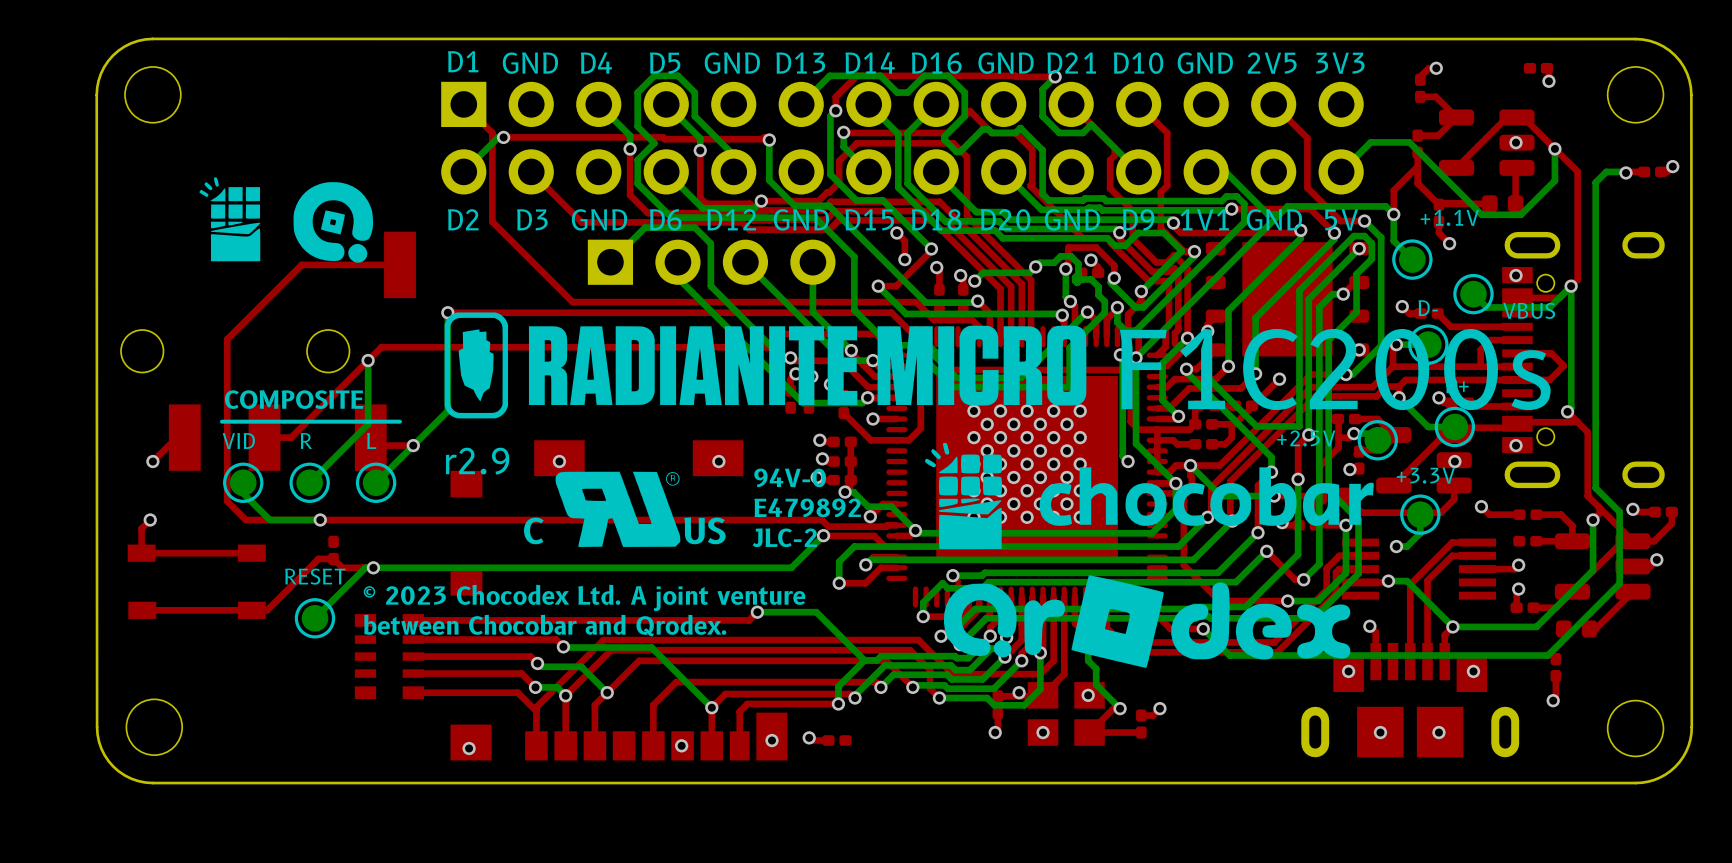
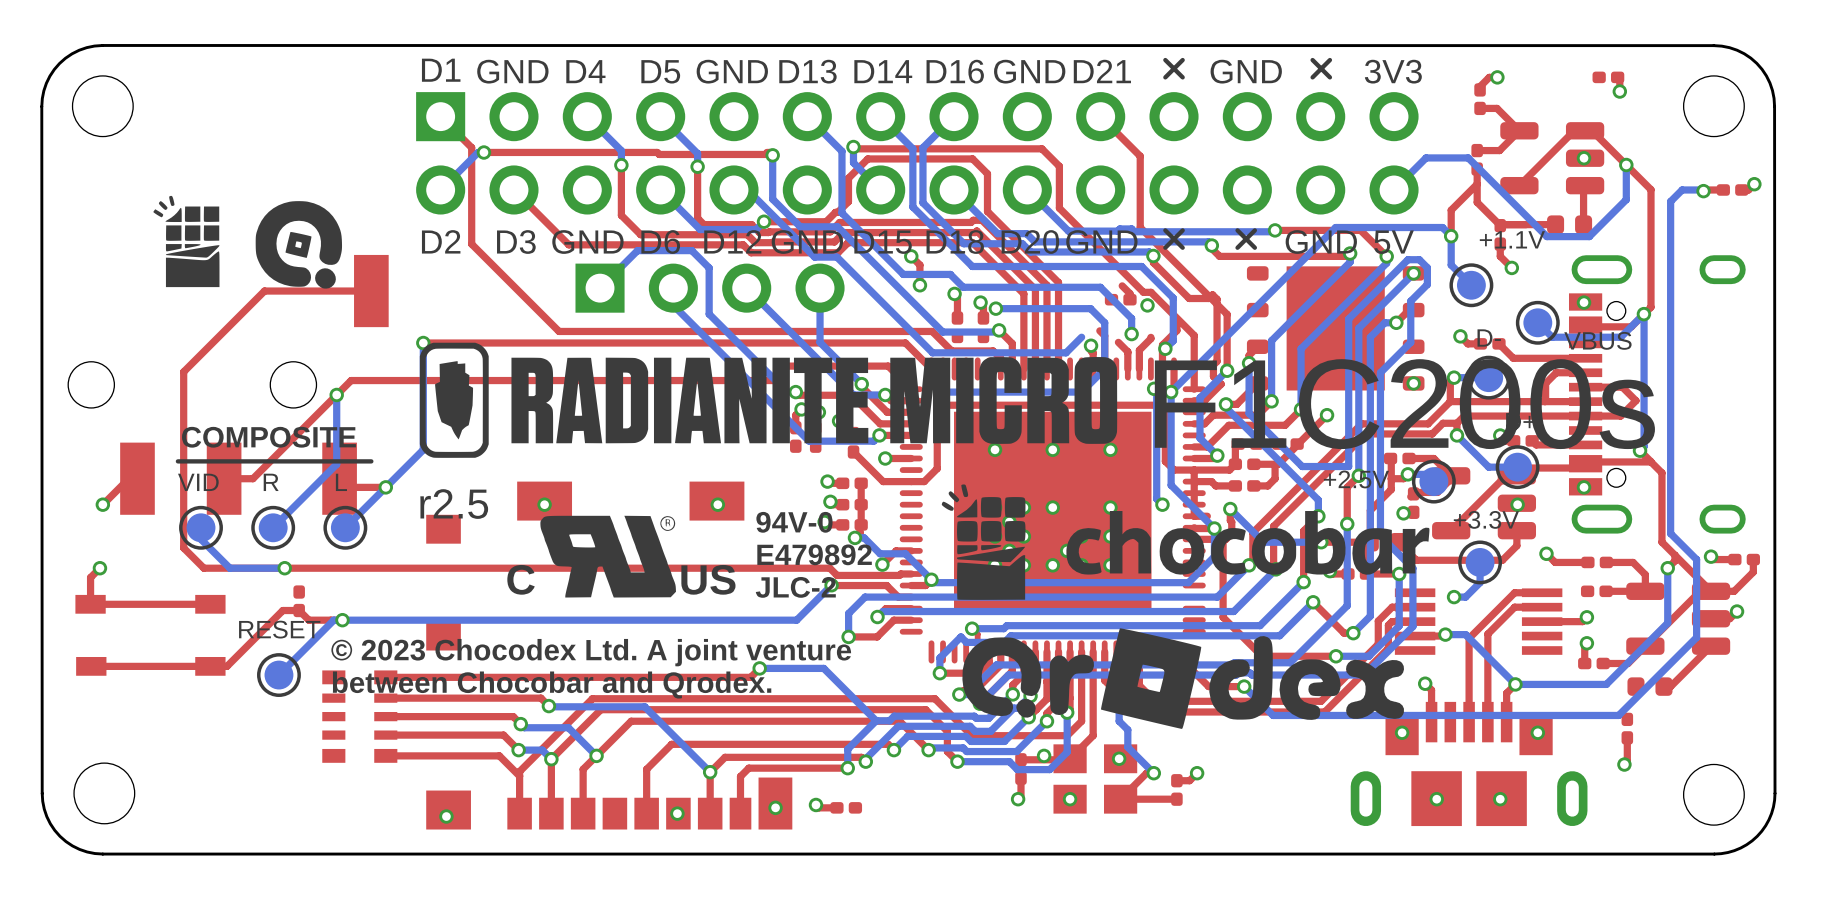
line: none -> (1165, 60) (1182, 77)
line: none -> (1182, 60) (1165, 77)
line: none -> (1312, 60) (1329, 77)
line: none -> (1329, 60) (1312, 77)
text: D10 (1138, 63) -> none
text: 2V5 (1272, 63) -> none
top track: (1055, 76) (856, 75) (835, 96) (835, 110) -> none
bottom track: (1055, 76) (1042, 89) (1042, 116) (1059, 132) (1083, 132) (1091, 124) (1138, 171) -> none
via: (1055, 76) -> none
bottom track: (801, 104) (829, 75) (880, 75) (897, 92) (907, 92) (924, 75) (948, 75) (964, 92) (964, 116) (944, 136) (944, 140) (956, 151) (960, 151) (982, 129) (988, 129) (991, 132) (1015, 132) (1020, 128) (1042, 150) (1042, 194) (1049, 200) (1103, 198) (1106, 201) (1221, 201) (1226, 196) (1236, 196) (1244, 203) (1244, 222) (1135, 330) (1125, 330) (1117, 322) (1117, 307) -> (807, 116) (841, 151) (841, 213) (903, 274) (950, 274) (963, 287) (1100, 287) (1131, 318) (1131, 334)
top track: (1138, 104) (1167, 132) (1167, 185) (1160, 192) (1160, 228) (1184, 251) (1194, 251) -> none
top track: (1273, 104) (1307, 138) (1307, 187) (1340, 221) (1364, 221) -> none
bottom track: (835, 110) (830, 116) (830, 174) (856, 200) (882, 200) (931, 248) -> none
via: (835, 110) -> none
top track: (844, 132) (948, 132) (969, 111) (991, 132) (1015, 132) (1032, 149) (1032, 183) (1030, 185) (1033, 188) -> (854, 147) (1041, 148) (1059, 166) (1059, 208)
top track: (1107, 140) (1114, 147) (1114, 155) (1110, 160) (1110, 188) (1132, 211) (1132, 238) (1156, 262) (1166, 262) (1174, 255) (1187, 268) (1187, 286) -> (1140, 156) (1140, 227) (1227, 314)
bottom track: (733, 171) (733, 155) (694, 116) (694, 92) (678, 75) (654, 75) (637, 92) (637, 126) (654, 143) (637, 160) (637, 183) (671, 217) (815, 217) (854, 256) (854, 310) (889, 345) (928, 345) (936, 352) (936, 357) (956, 377) (1021, 377) (1087, 312) -> (733, 189) (747, 189) (814, 257) (836, 257) (932, 352) (1066, 352) (1081, 337)
bottom track: (1206, 171) (1225, 171) (1268, 214) (1279, 214) -> none
top track: (967, 191) (967, 216) (1031, 280) (1032, 336) -> (987, 211) (1058, 282) (1058, 368)
top track: (939, 201) (1021, 283) -> (957, 222) (982, 220) (1046, 285) (1046, 311)
line: none -> (1165, 230) (1182, 247)
line: none -> (1182, 230) (1165, 247)
line: none -> (1237, 230) (1254, 247)
line: none -> (1254, 230) (1237, 247)
top track: (935, 211) (1011, 286) -> (953, 232) (976, 230) (1035, 289) (1035, 314)
text: D9 (1138, 219) -> none
text: 1V1 (1204, 219) -> none
top track: (931, 220) (1000, 289) -> (949, 242) (972, 242) (1023, 293) (1023, 317)
bottom track: (1364, 221) (1381, 237) (1381, 345) (1352, 374) (1345, 374) -> none
via: (1364, 221) -> none
bottom track: (941, 230) (995, 230) (1002, 238) (1107, 238) (1114, 245) (1125, 245) (1137, 233) (1163, 233) (1181, 250) (1141, 291) -> (959, 253) (972, 266) (1141, 266) (1173, 298) (1173, 340) (1165, 348)
top track: (1082, 238) (1107, 238) (1148, 281) (1168, 281) (1168, 325) (1165, 329) (1165, 346) (1157, 355) -> (1113, 262) (1143, 292) (1151, 292) (1194, 335) (1194, 389)
top track: (931, 248) (896, 286) (878, 286) -> none
via: (931, 248) -> none
bottom track: (1194, 251) (1194, 256) (1143, 307) (1135, 307) (1110, 282) (1114, 278) -> none
via: (1194, 251) -> none
via: (1091, 260) -> none
via: (1035, 266) -> none
top track: (1065, 268) (1068, 266) (1068, 247) (1096, 247) (1114, 265) (1114, 278) -> none
bottom track: (1065, 268) (1065, 296) (1070, 301) -> none
via: (1065, 268) -> none
bottom track: (974, 281) (982, 272) (1029, 272) (1039, 262) (1054, 262) (1060, 256) (1071, 256) (1078, 263) (1078, 274) (1075, 280) (1077, 282) (1080, 279) (1091, 279) (1098, 286) (1098, 295) (1104, 301) (1104, 312) (1069, 347) (1069, 387) (952, 387) (923, 357) -> (995, 308) (1090, 308) (1104, 322) (1104, 368) (1081, 392) (940, 392)
bottom track: (878, 286) (906, 313) (1062, 315) -> none
via: (878, 286) -> none
via: (1141, 291) -> none
via: (1070, 301) -> none
via position: (1117, 307) -> (1165, 348)
via position: (1087, 312) -> (1131, 334)
top track: (1345, 374) (1310, 374) (1219, 465) (1175, 465) (1169, 472) -> none
via: (1345, 374) -> none
via: (1000, 411) -> none
via: (1053, 411) -> none
via: (987, 424) -> none
via: (1013, 424) -> none
via: (1040, 424) -> none
via: (1066, 424) -> none
via: (973, 437) -> none
via: (1000, 437) -> none
via: (1027, 437) -> none
via: (1053, 437) -> none
via: (1080, 437) -> none
via: (987, 450) -> none
via: (1013, 450) -> none
via: (1040, 450) -> none
via: (1066, 450) -> none
text: r2.9 (477, 461) -> r2.5 (454, 504)
via: (1053, 464) -> none
via: (1013, 477) -> none
via: (1040, 477) -> none
via: (1066, 477) -> none
via: (1027, 490) -> none
via: (1013, 504) -> none
via: (1066, 504) -> none

